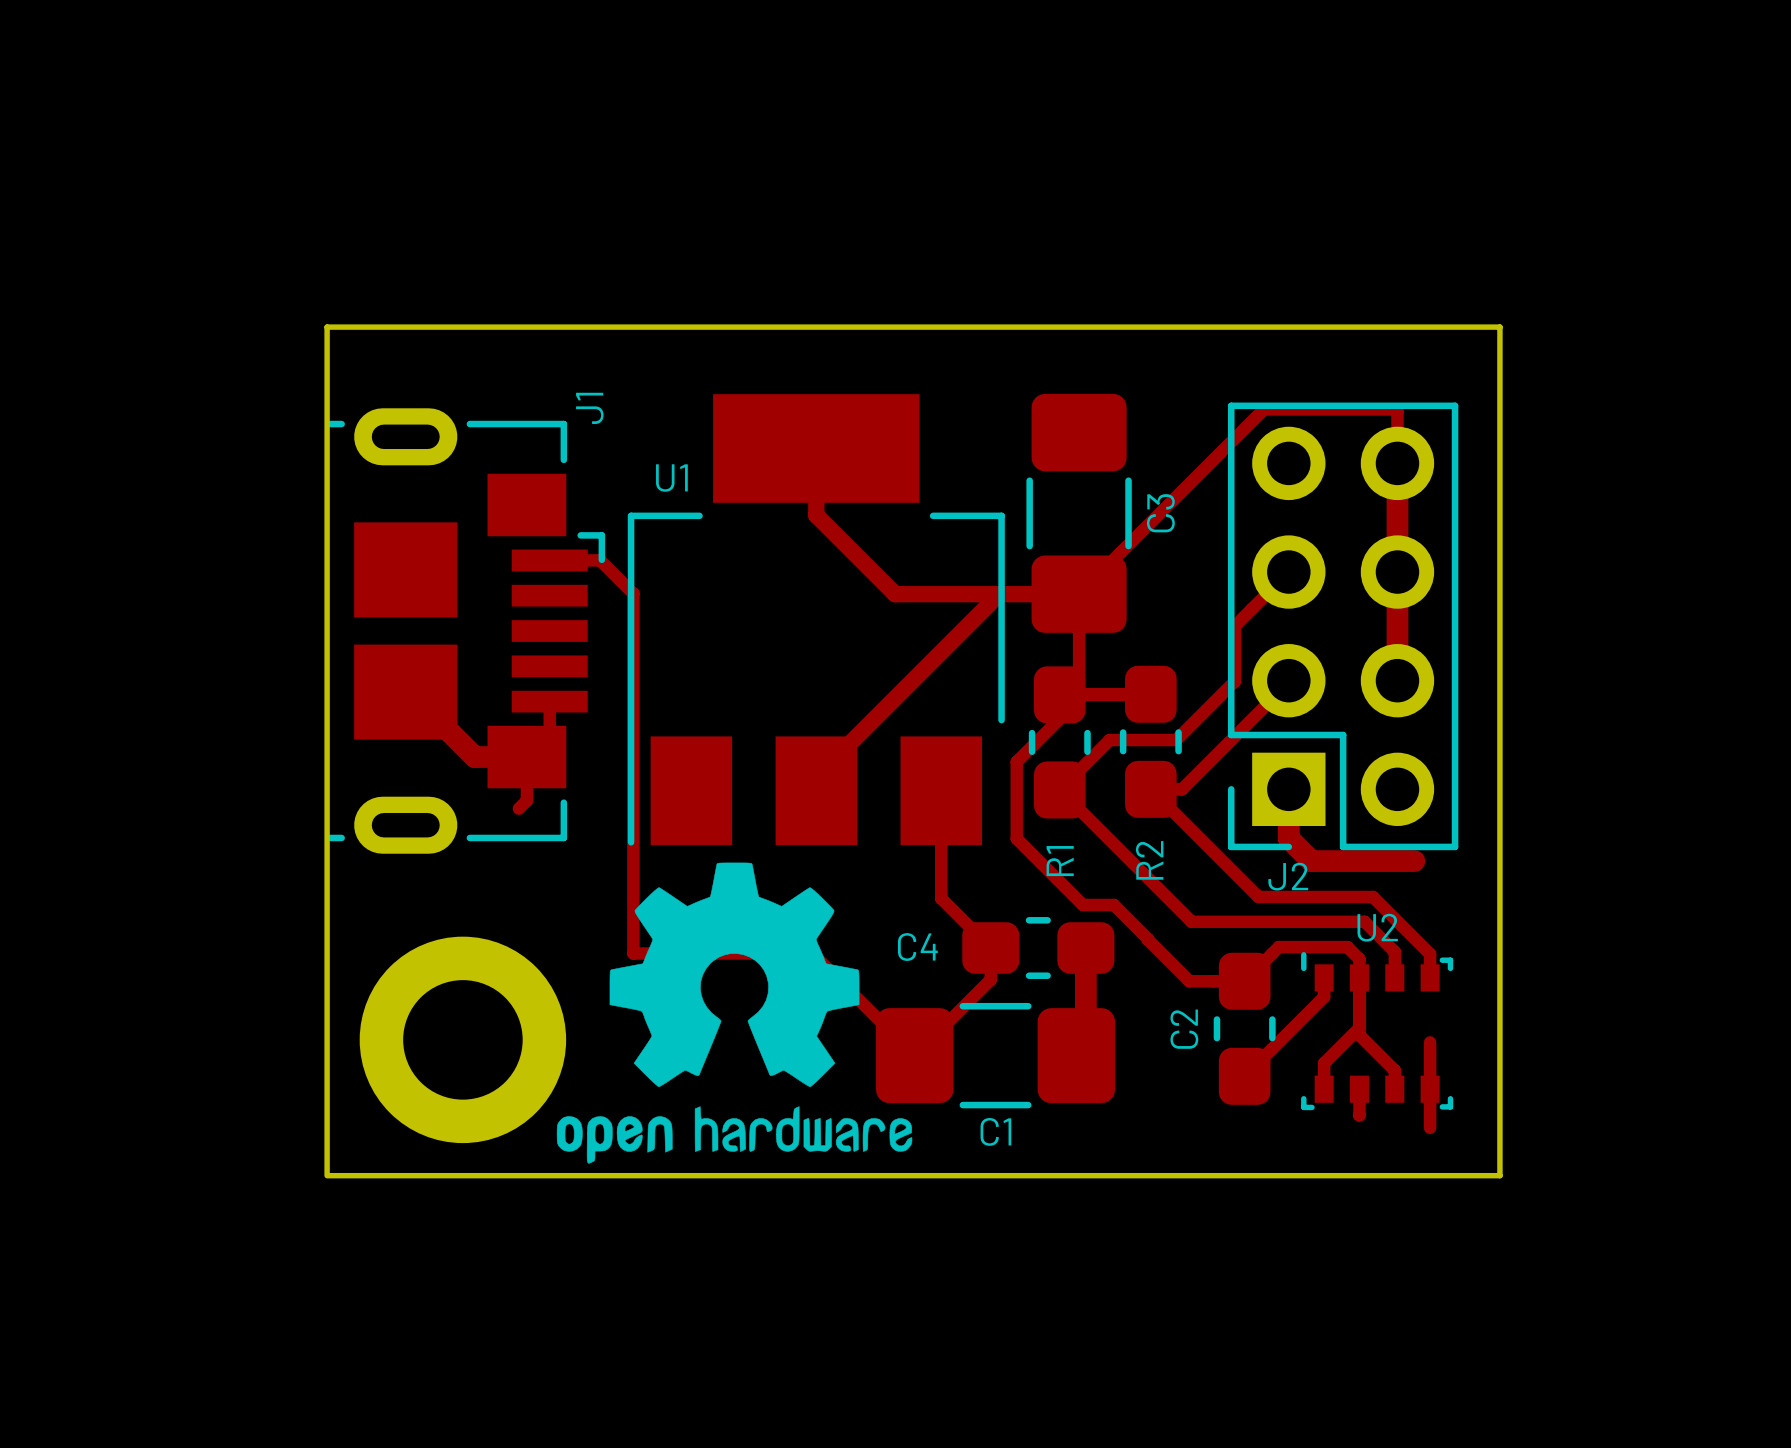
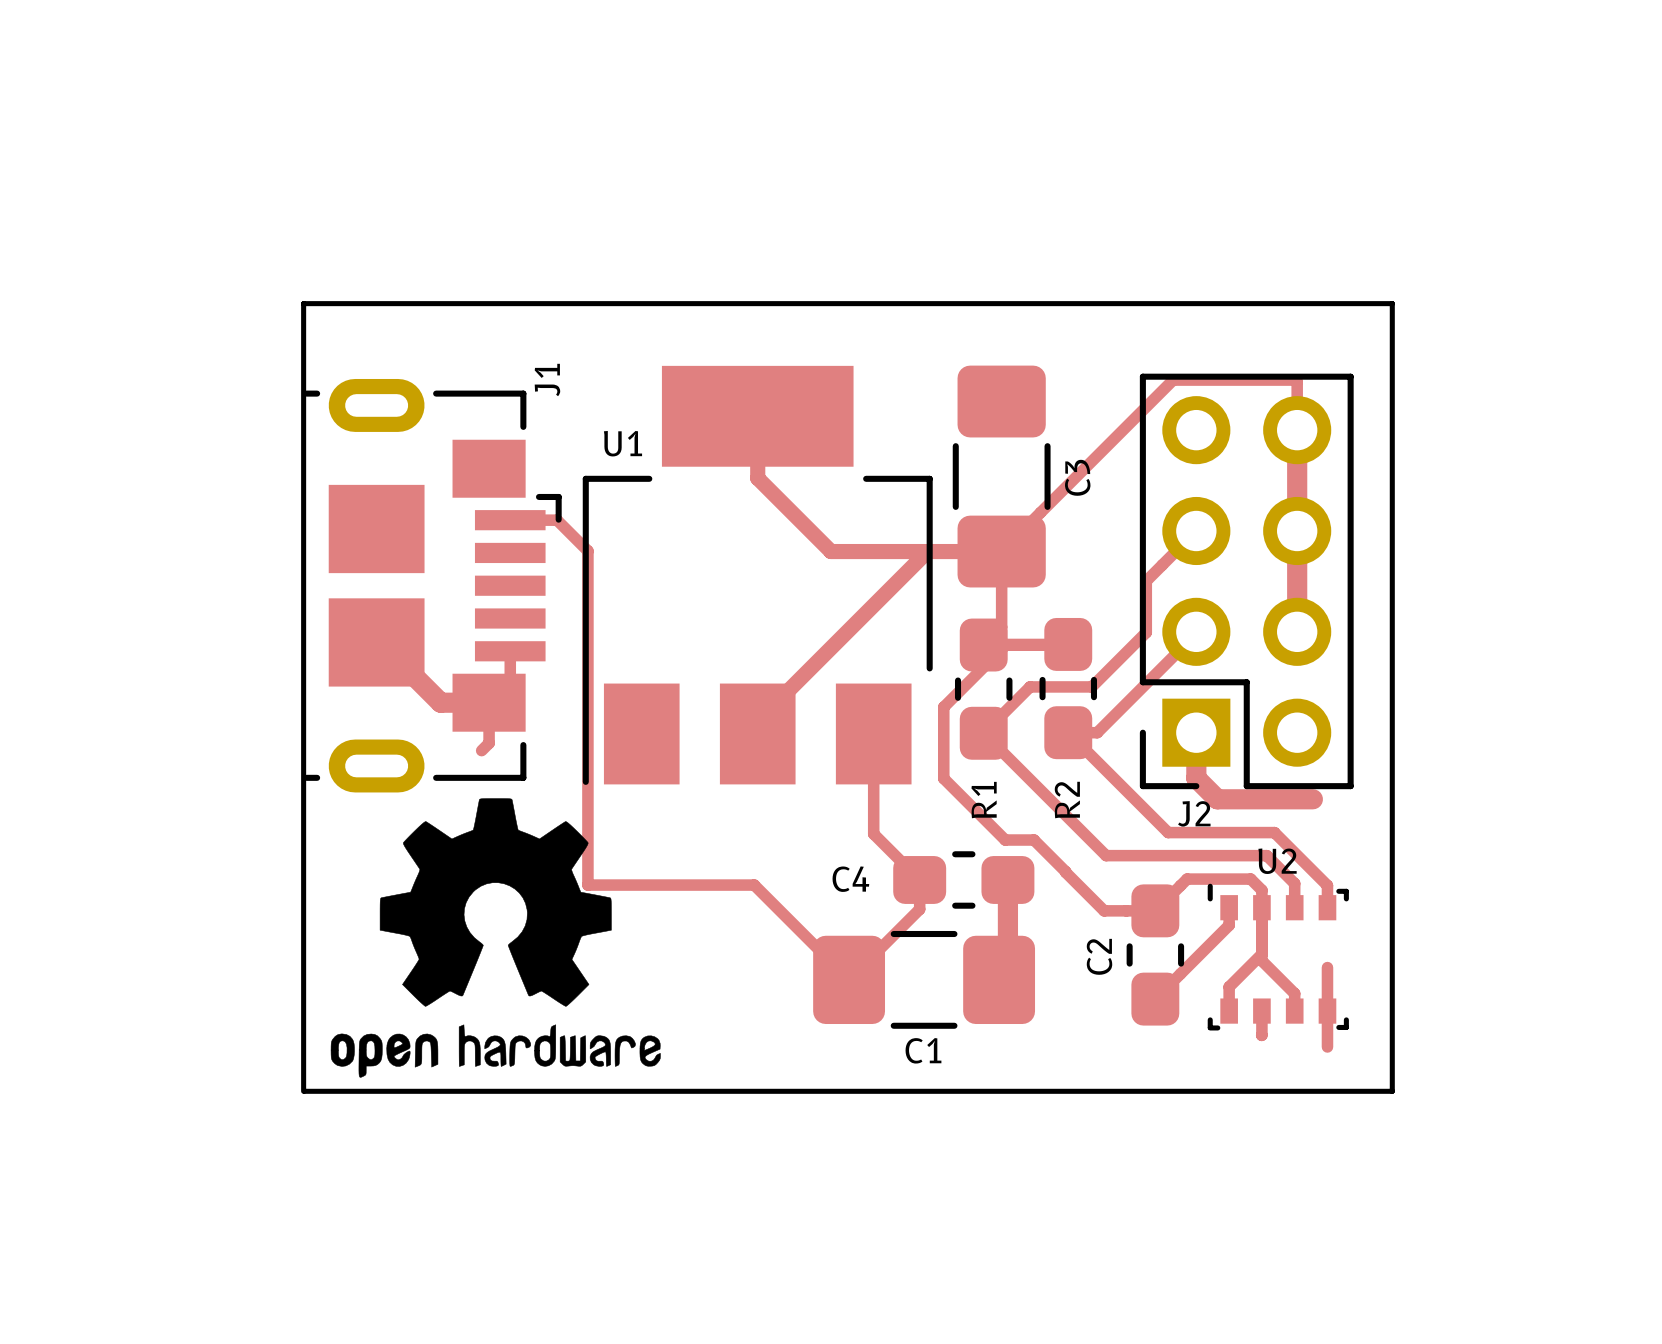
drawing position: (734, 1013) -> (495, 937)
part: (462, 1039) -> none

